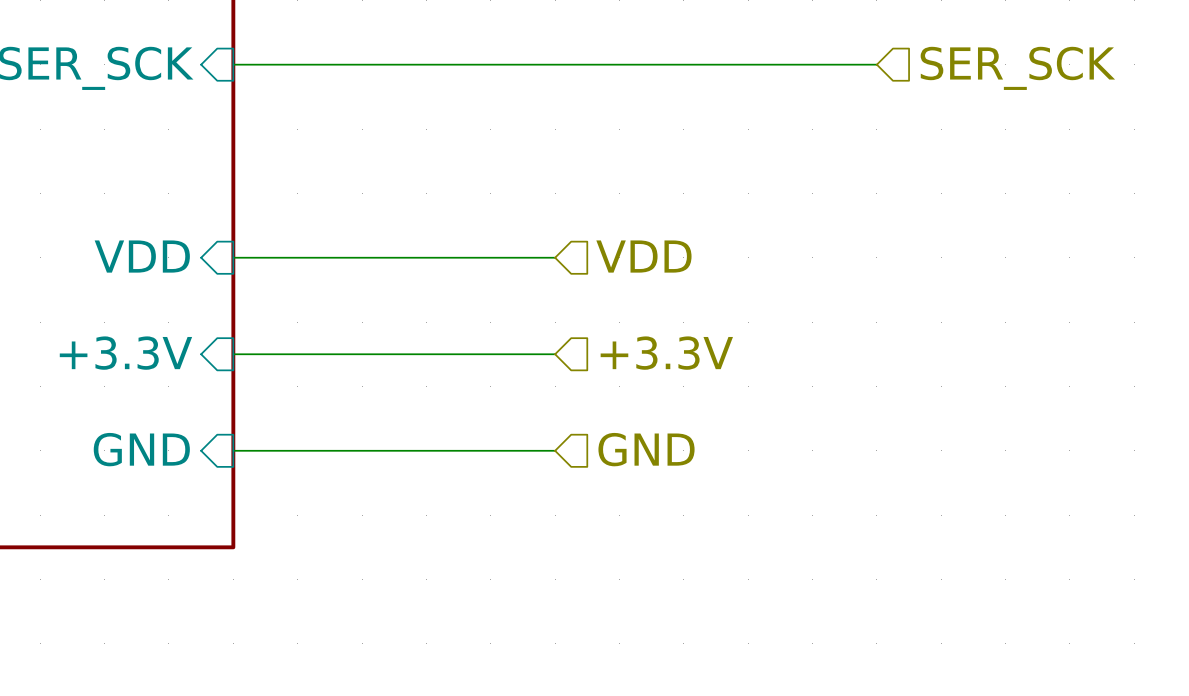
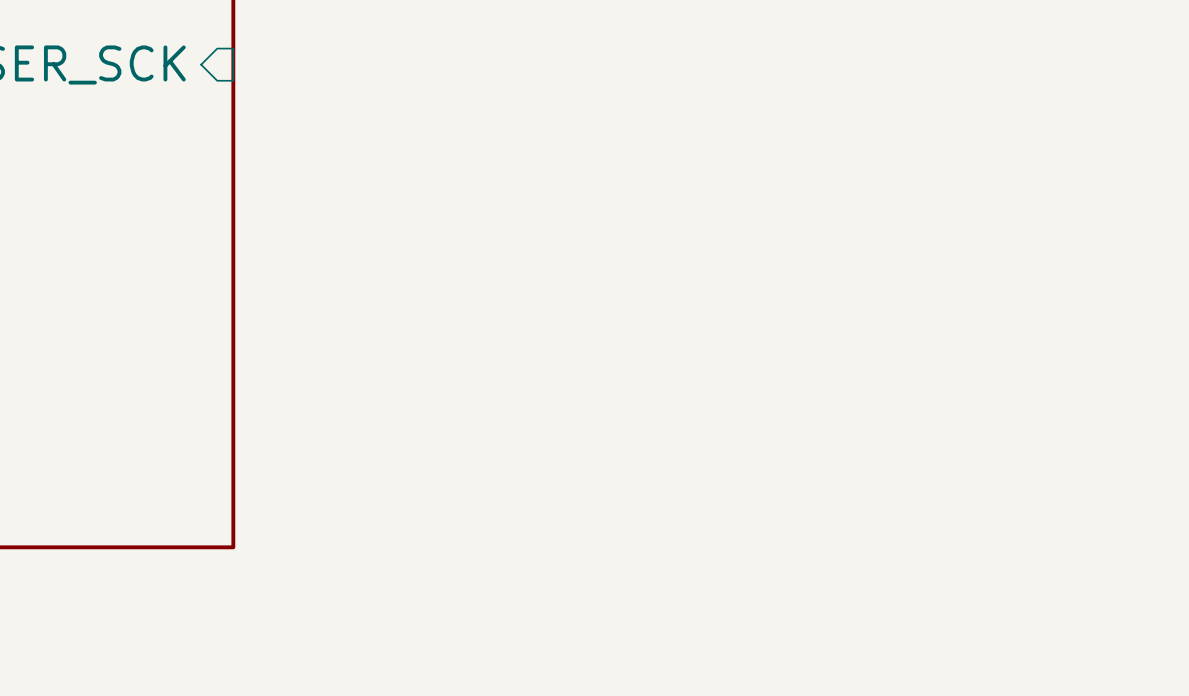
wire: (233, 64) (876, 64) -> none
hierarchical label: SER_SCK (1017, 68) -> none
sheet pin: VDD (142, 256) -> none
hierarchical label: VDD (643, 256) -> none
wire: (233, 257) (555, 257) -> none
sheet pin: +3.3V (125, 353) -> none
hierarchical label: +3.3V (666, 353) -> none
wire: (233, 354) (555, 354) -> none
sheet pin: GND (141, 449) -> none
hierarchical label: GND (646, 449) -> none
wire: (233, 450) (555, 450) -> none

